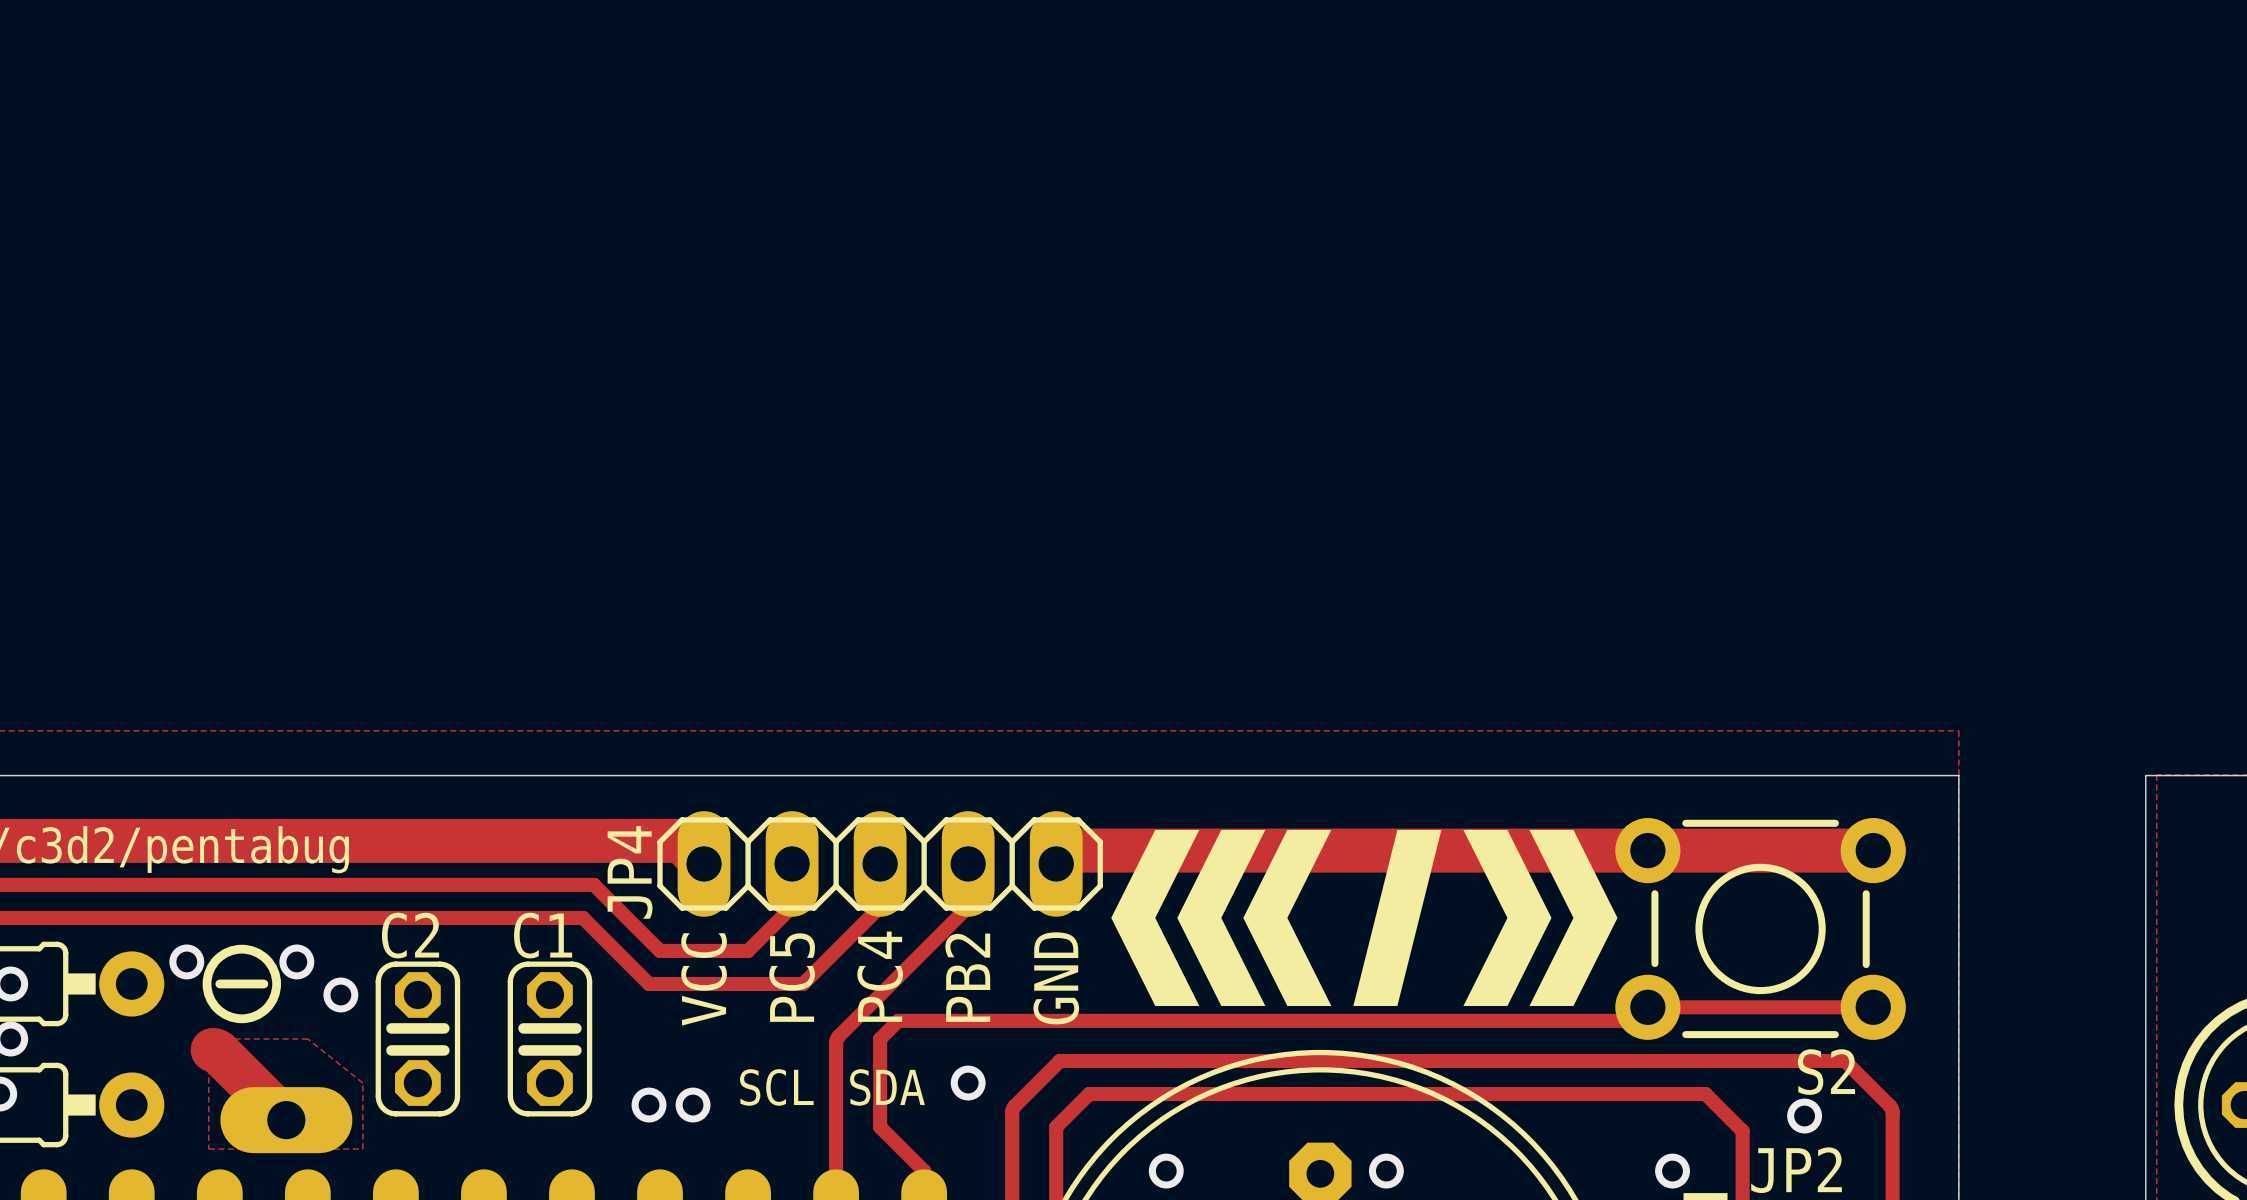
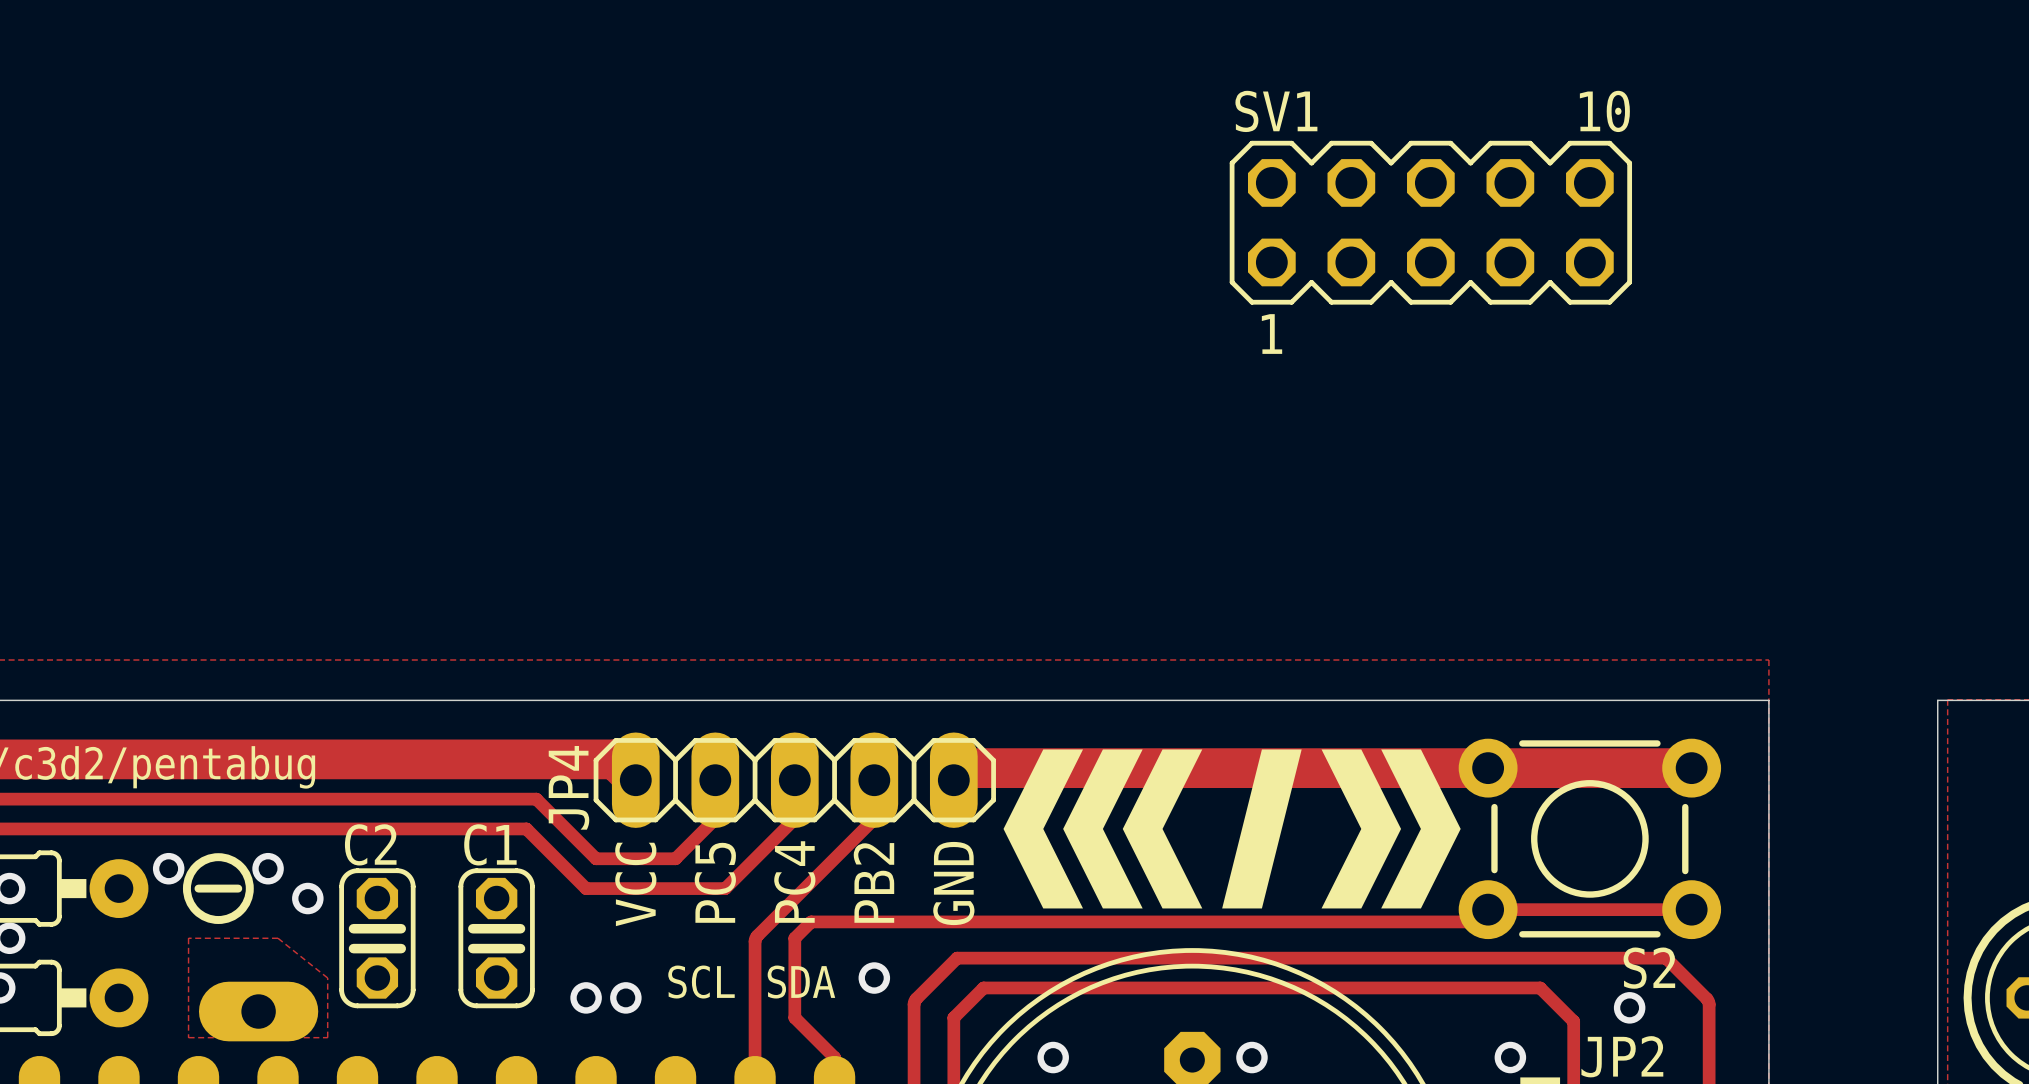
SV1: none -> (1430, 222)
track: (212, 1050) (218, 1052) (286, 1120) -> none

